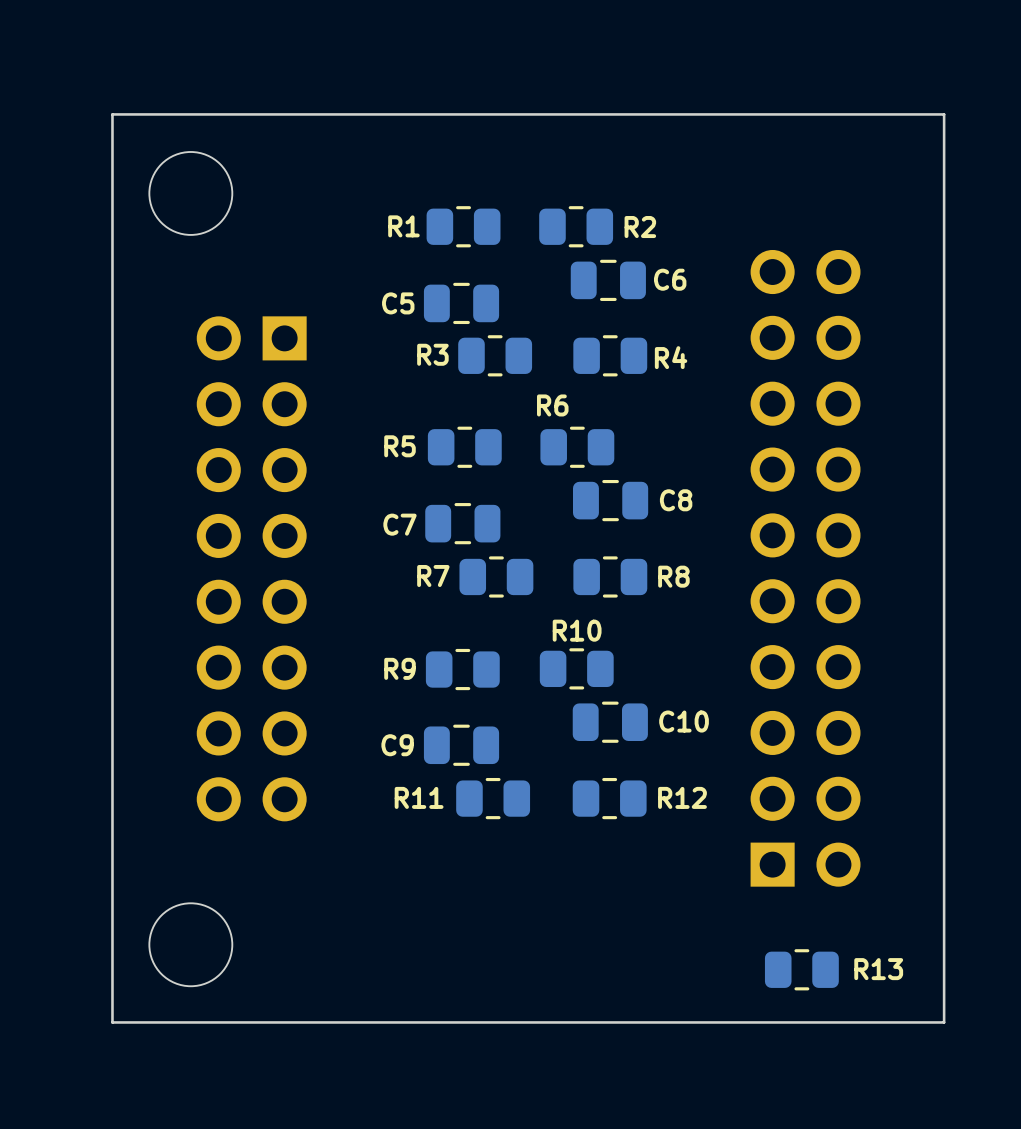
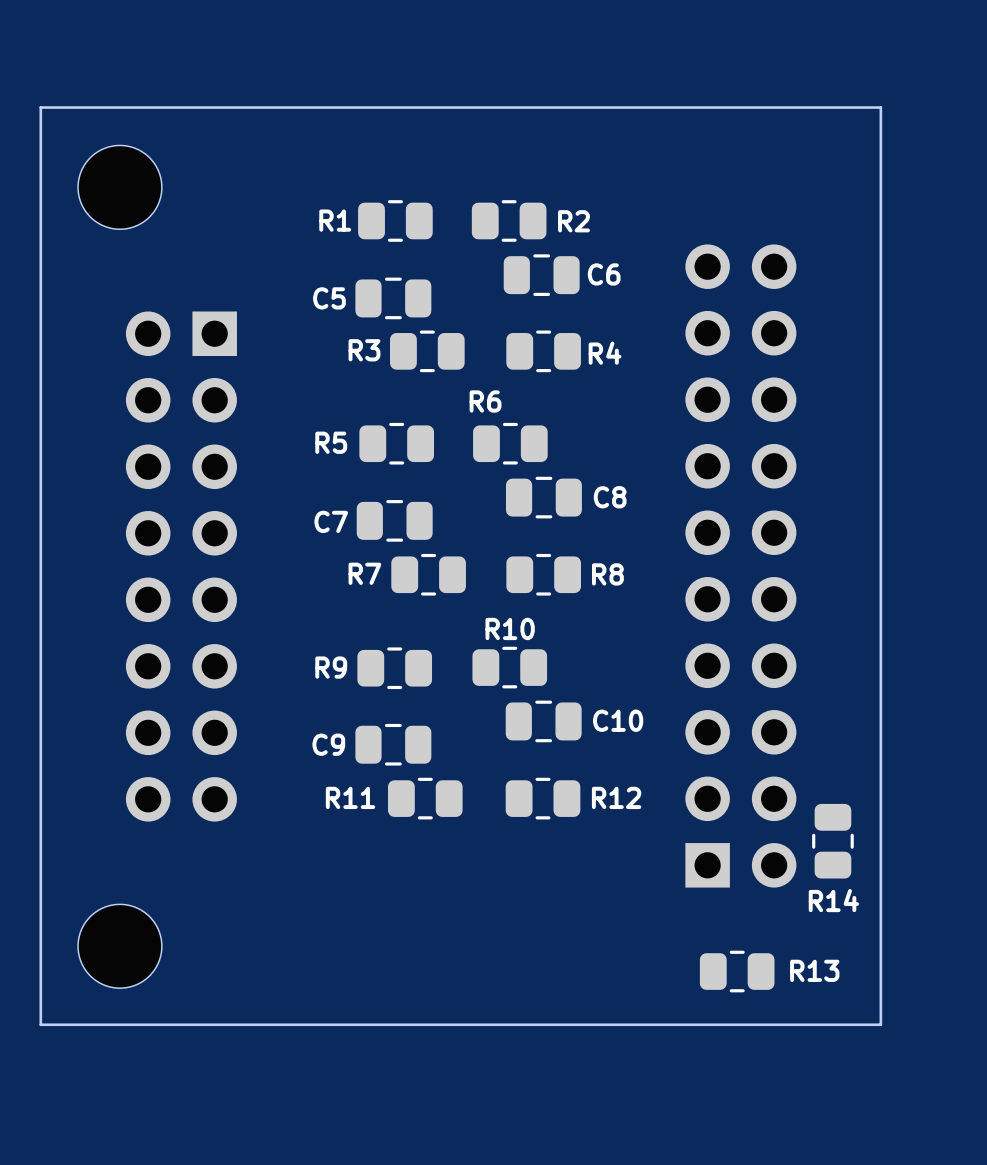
R14: none -> (832, 841)

